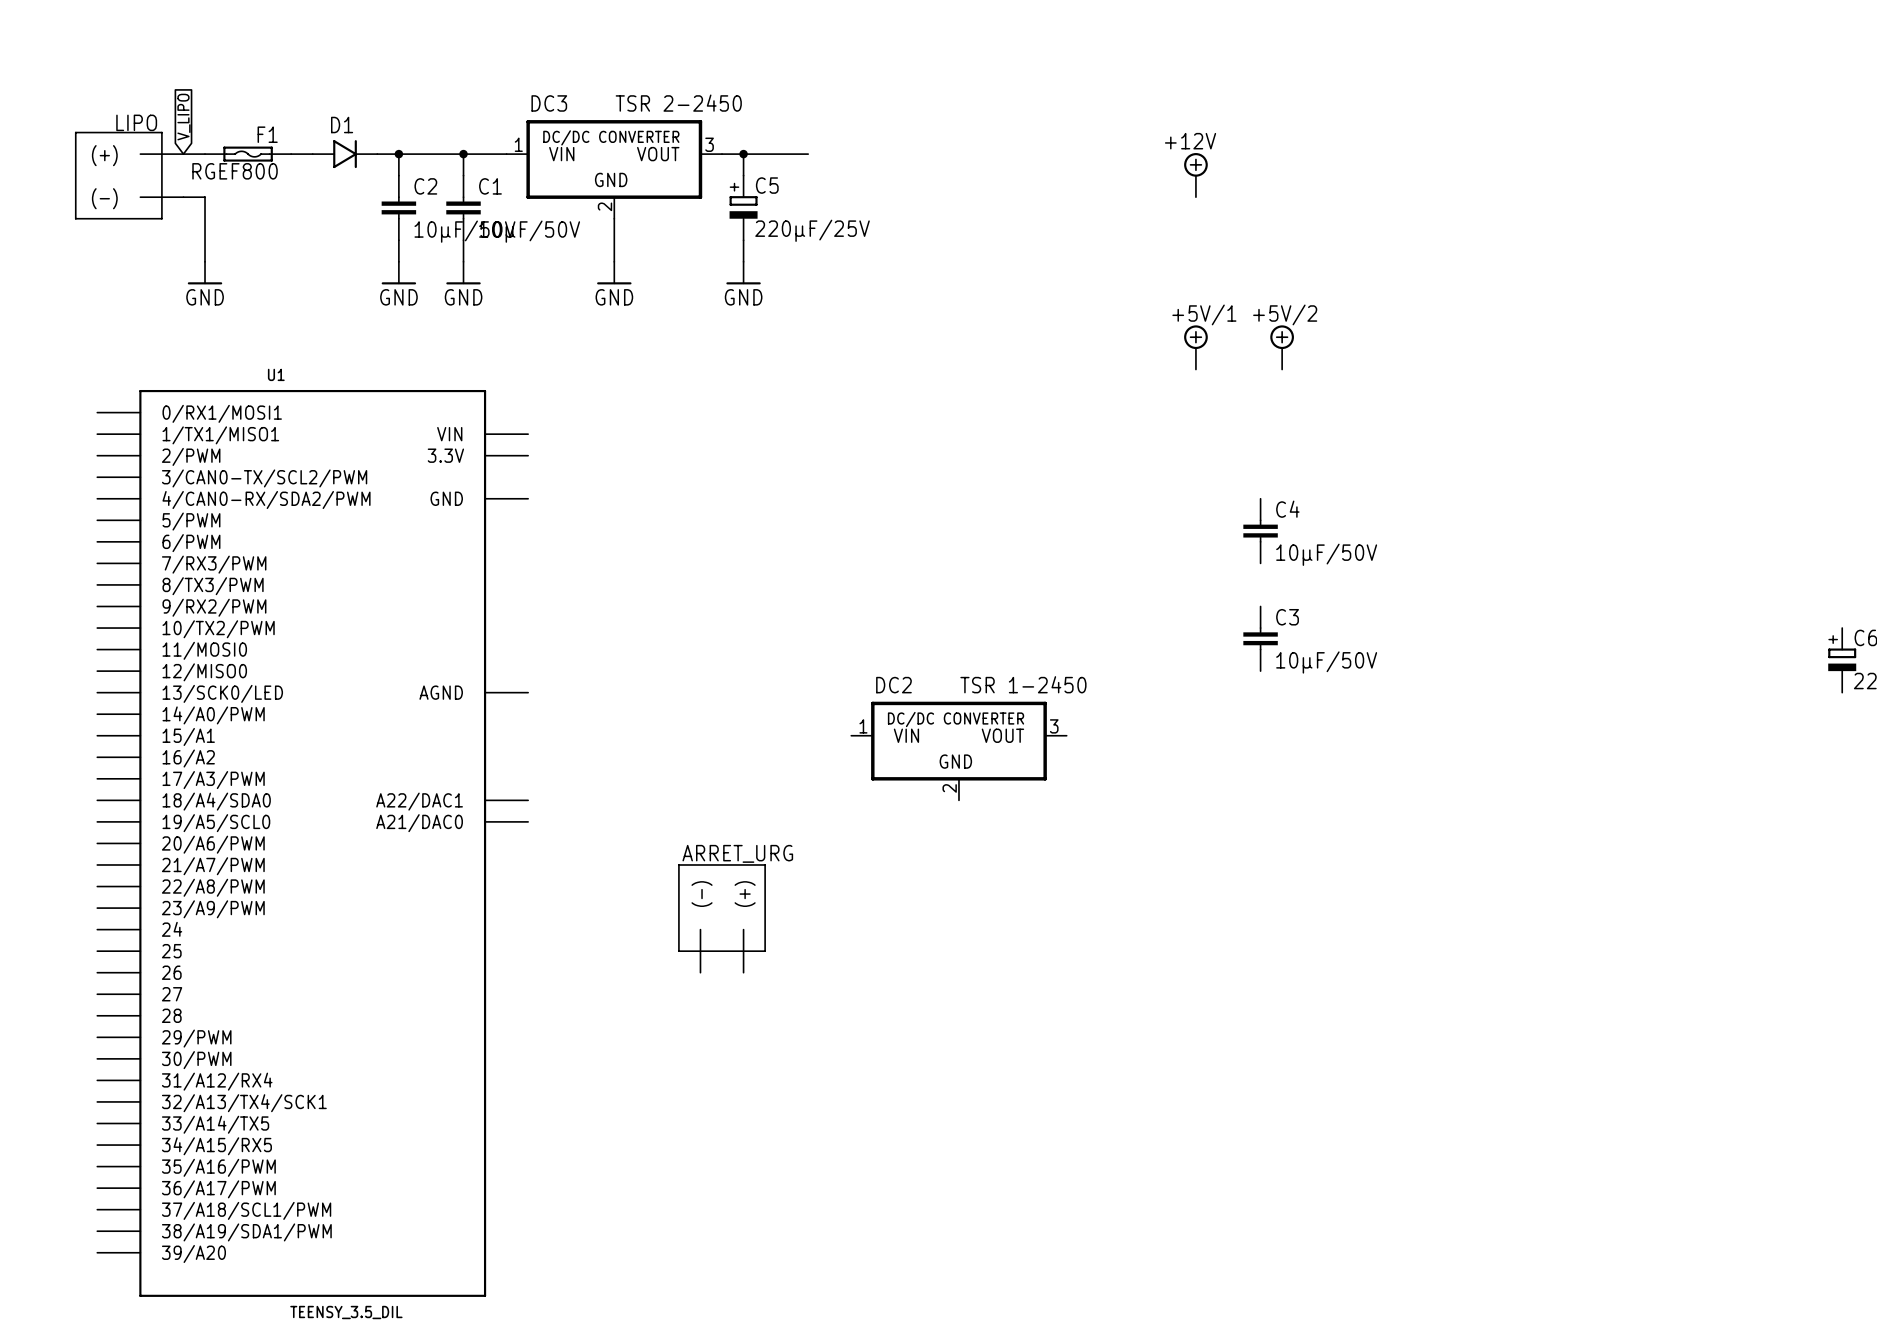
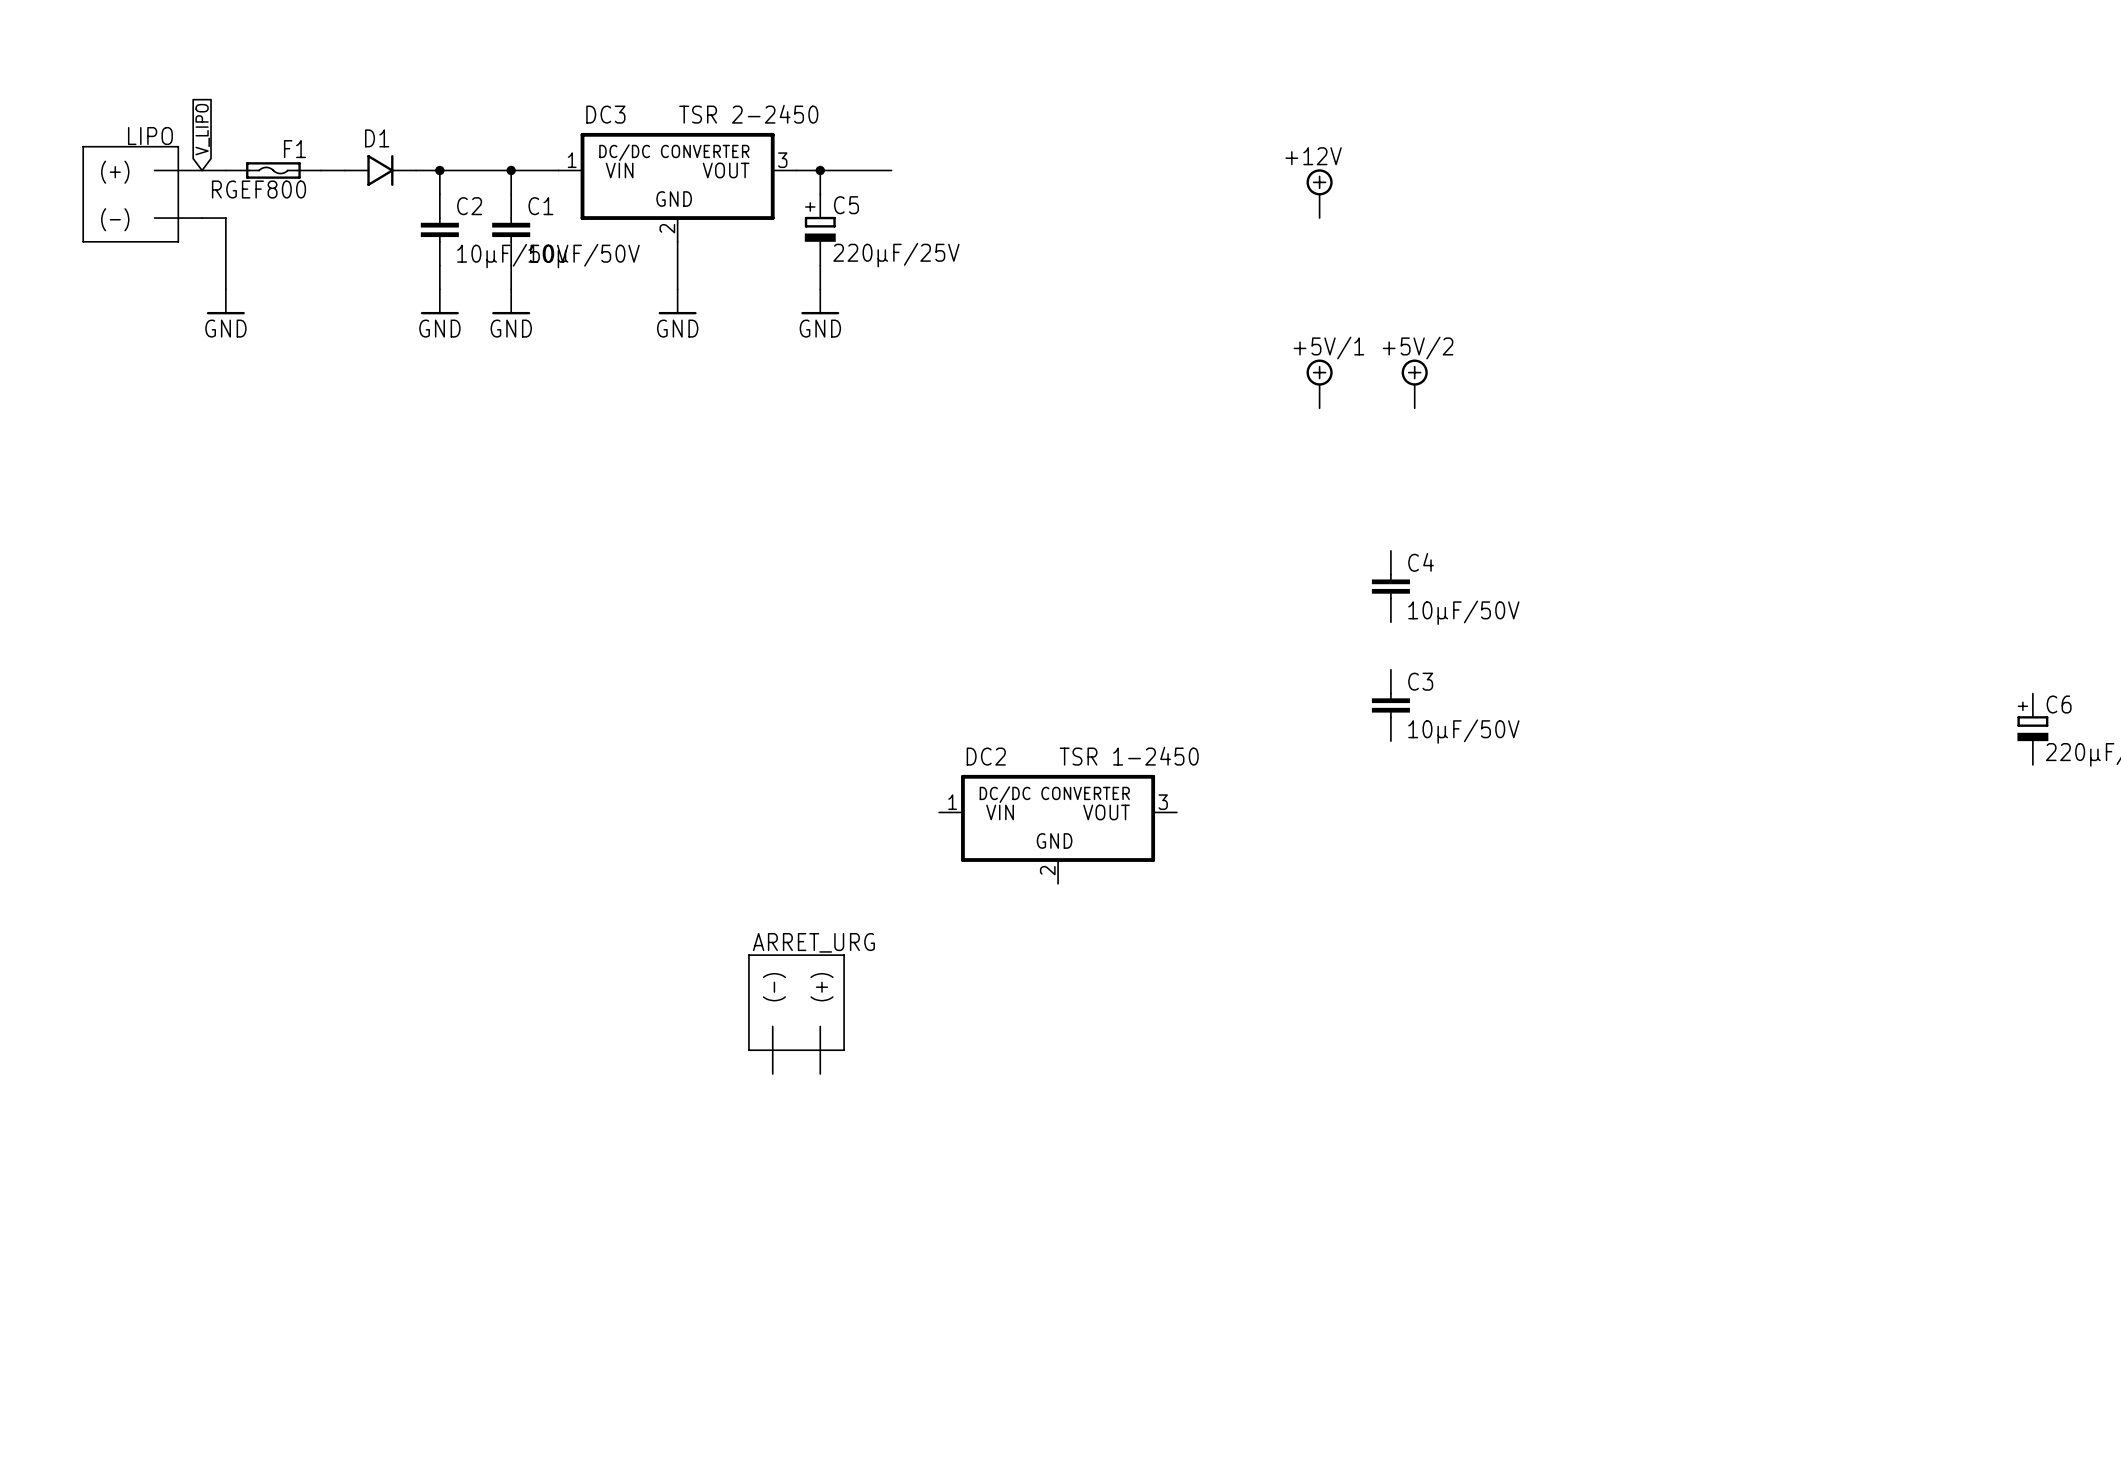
U1: TEENSY_3.5_DIL (312, 843) -> none

